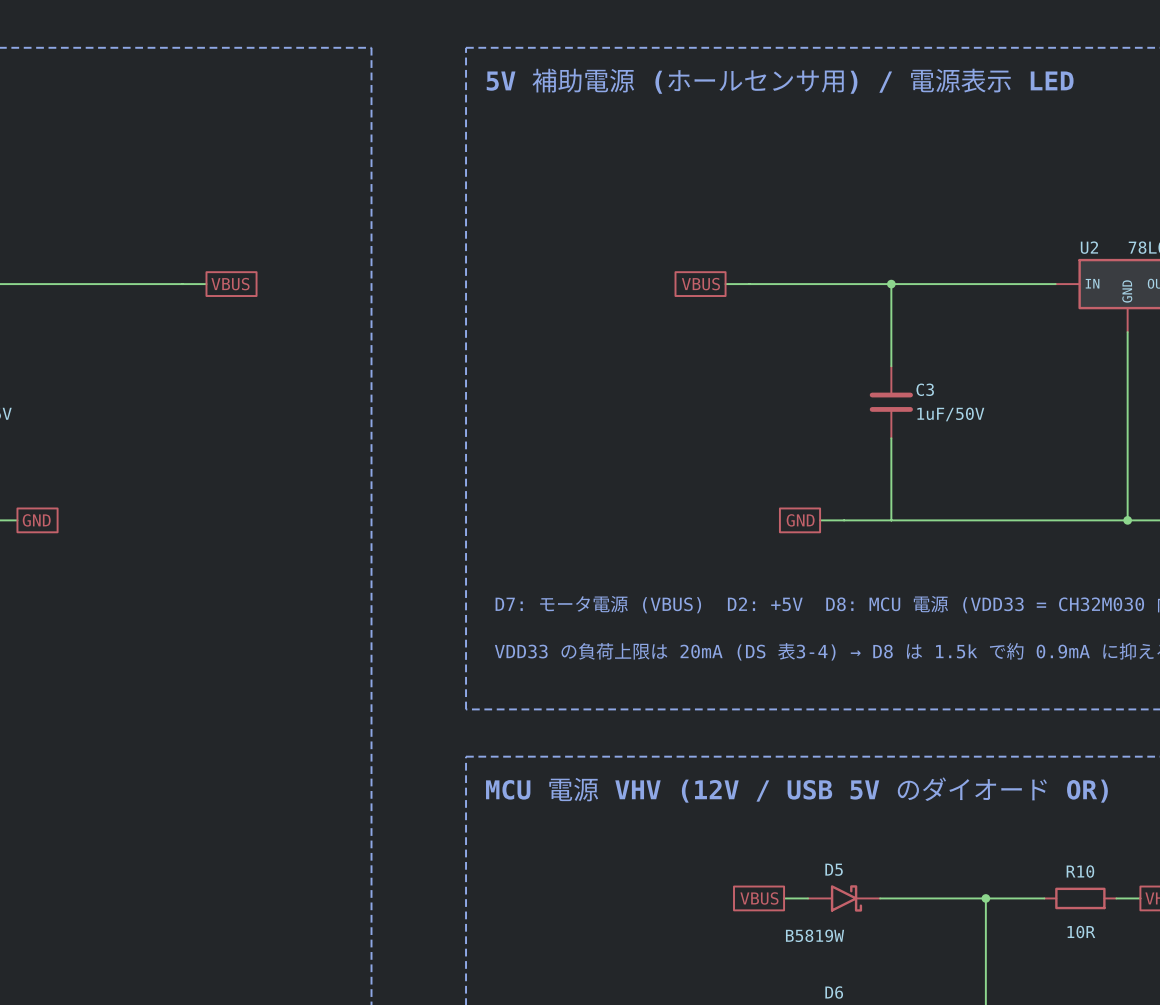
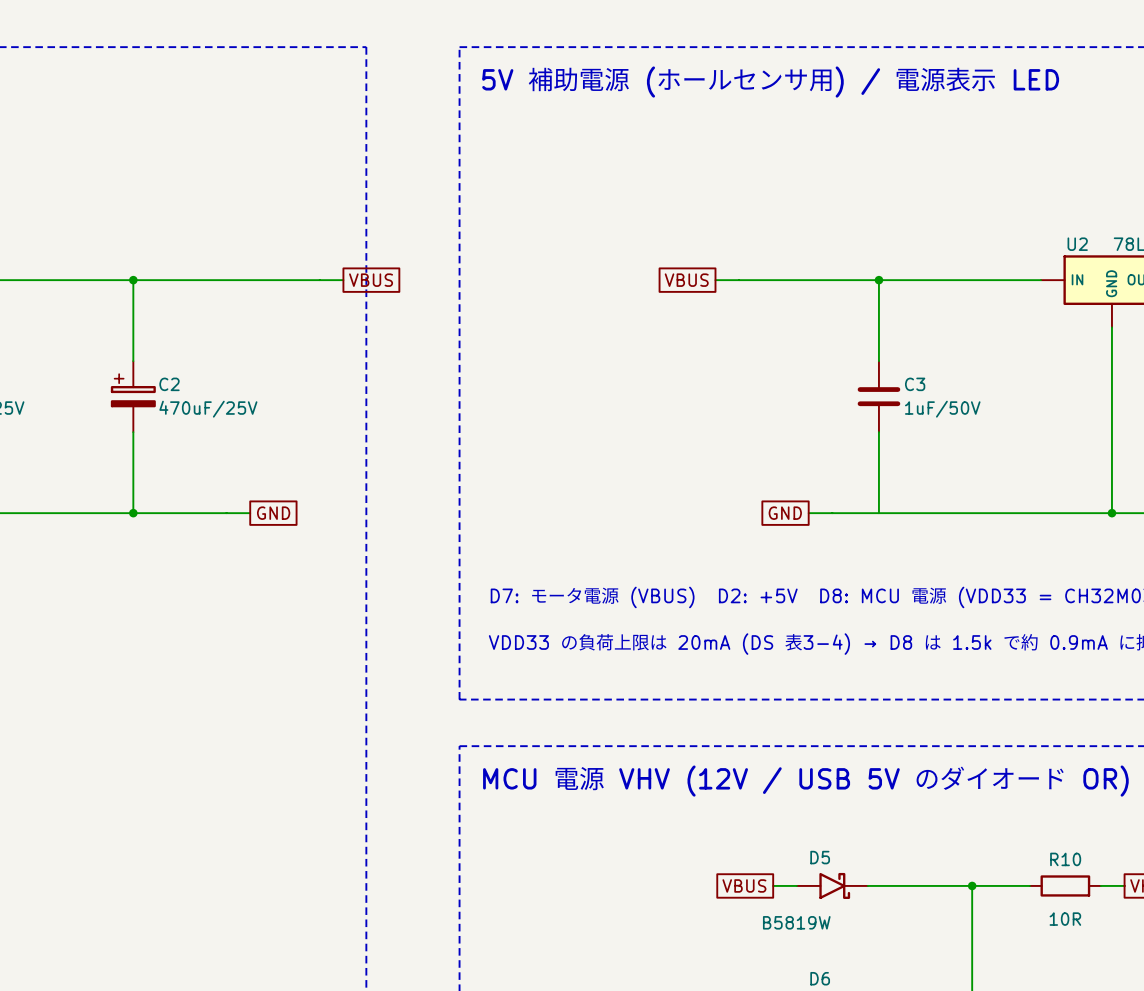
wire: none -> (133, 280) (133, 361)
junction: none -> (133, 280)
wire: none -> (203, 280) (343, 280)
global label position: VBUS (230, 284) -> VBUS (371, 280)
C2: none -> 470uF/25V (133, 396)
wire: none -> (133, 432) (133, 513)
wire: none -> (17, 513) (250, 513)
global label position: GND (36, 520) -> GND (273, 513)
junction: none -> (133, 513)

